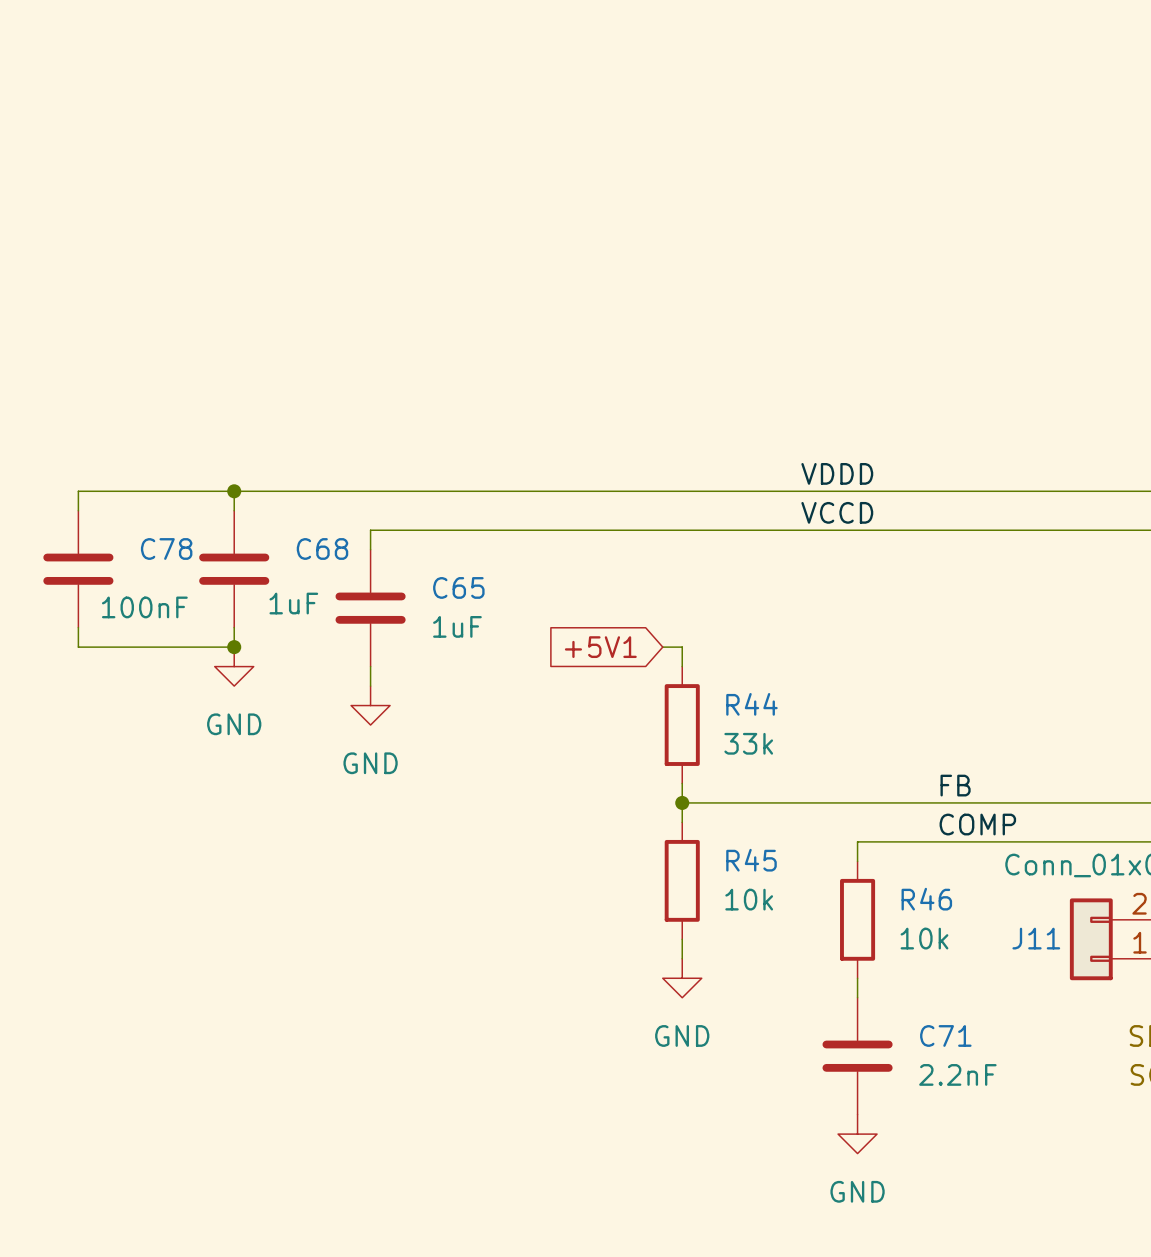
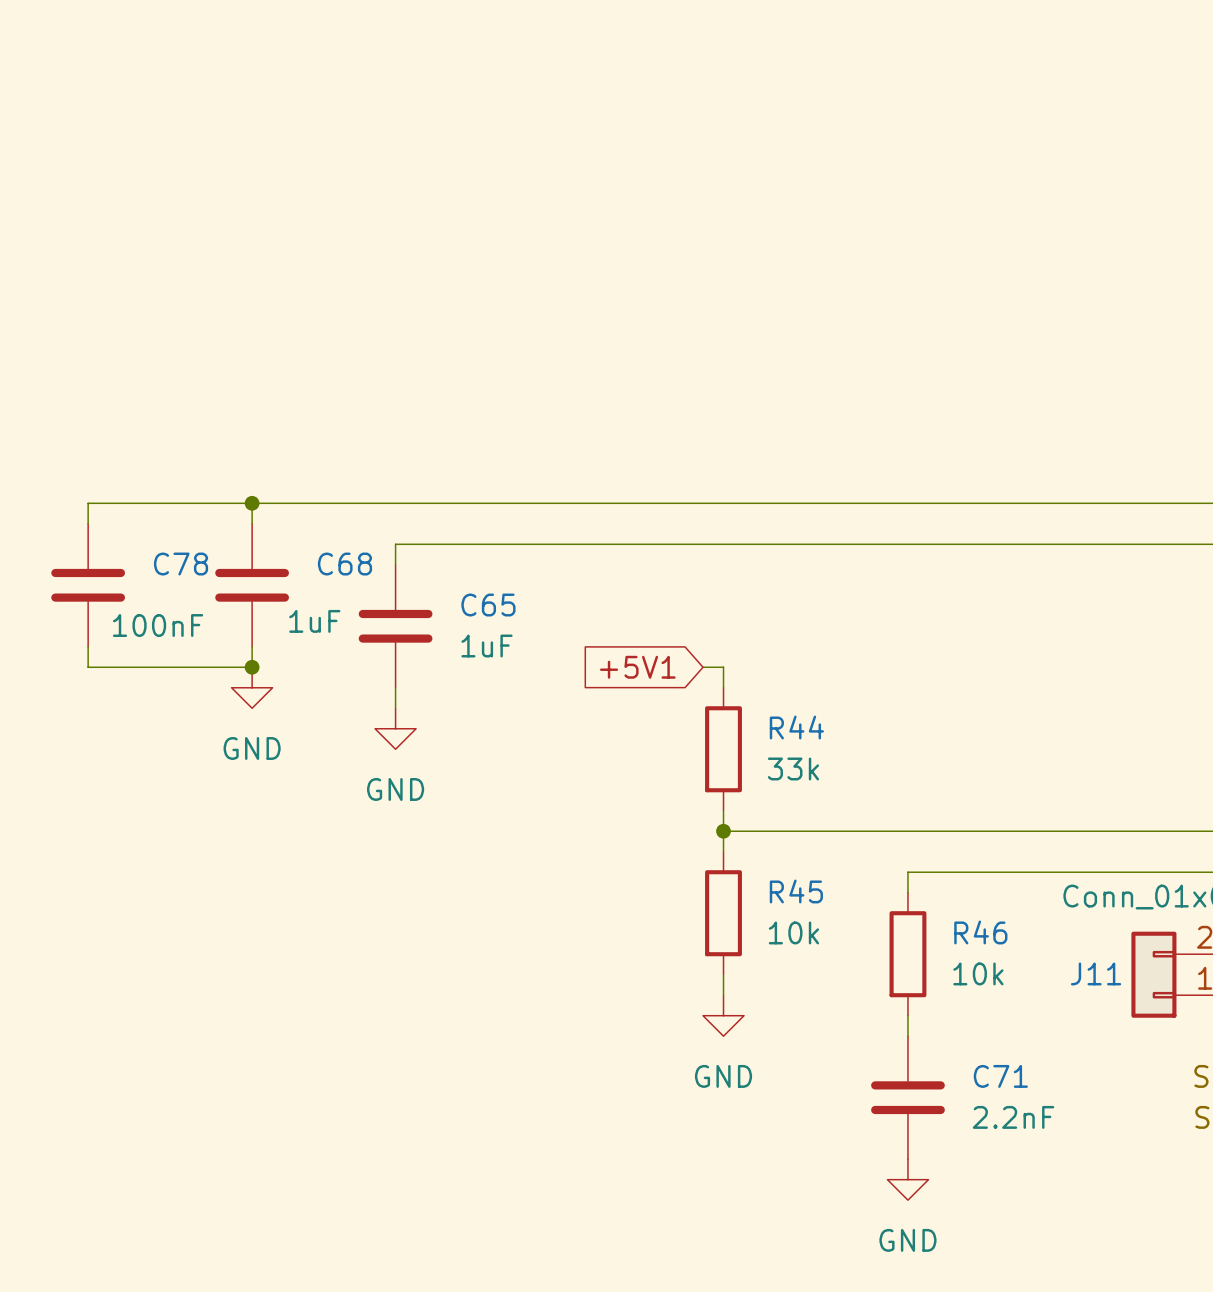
label: VDDD (837, 473) -> none
label: VCCD (837, 512) -> none
label: FB (955, 785) -> none
label: COMP (977, 824) -> none

